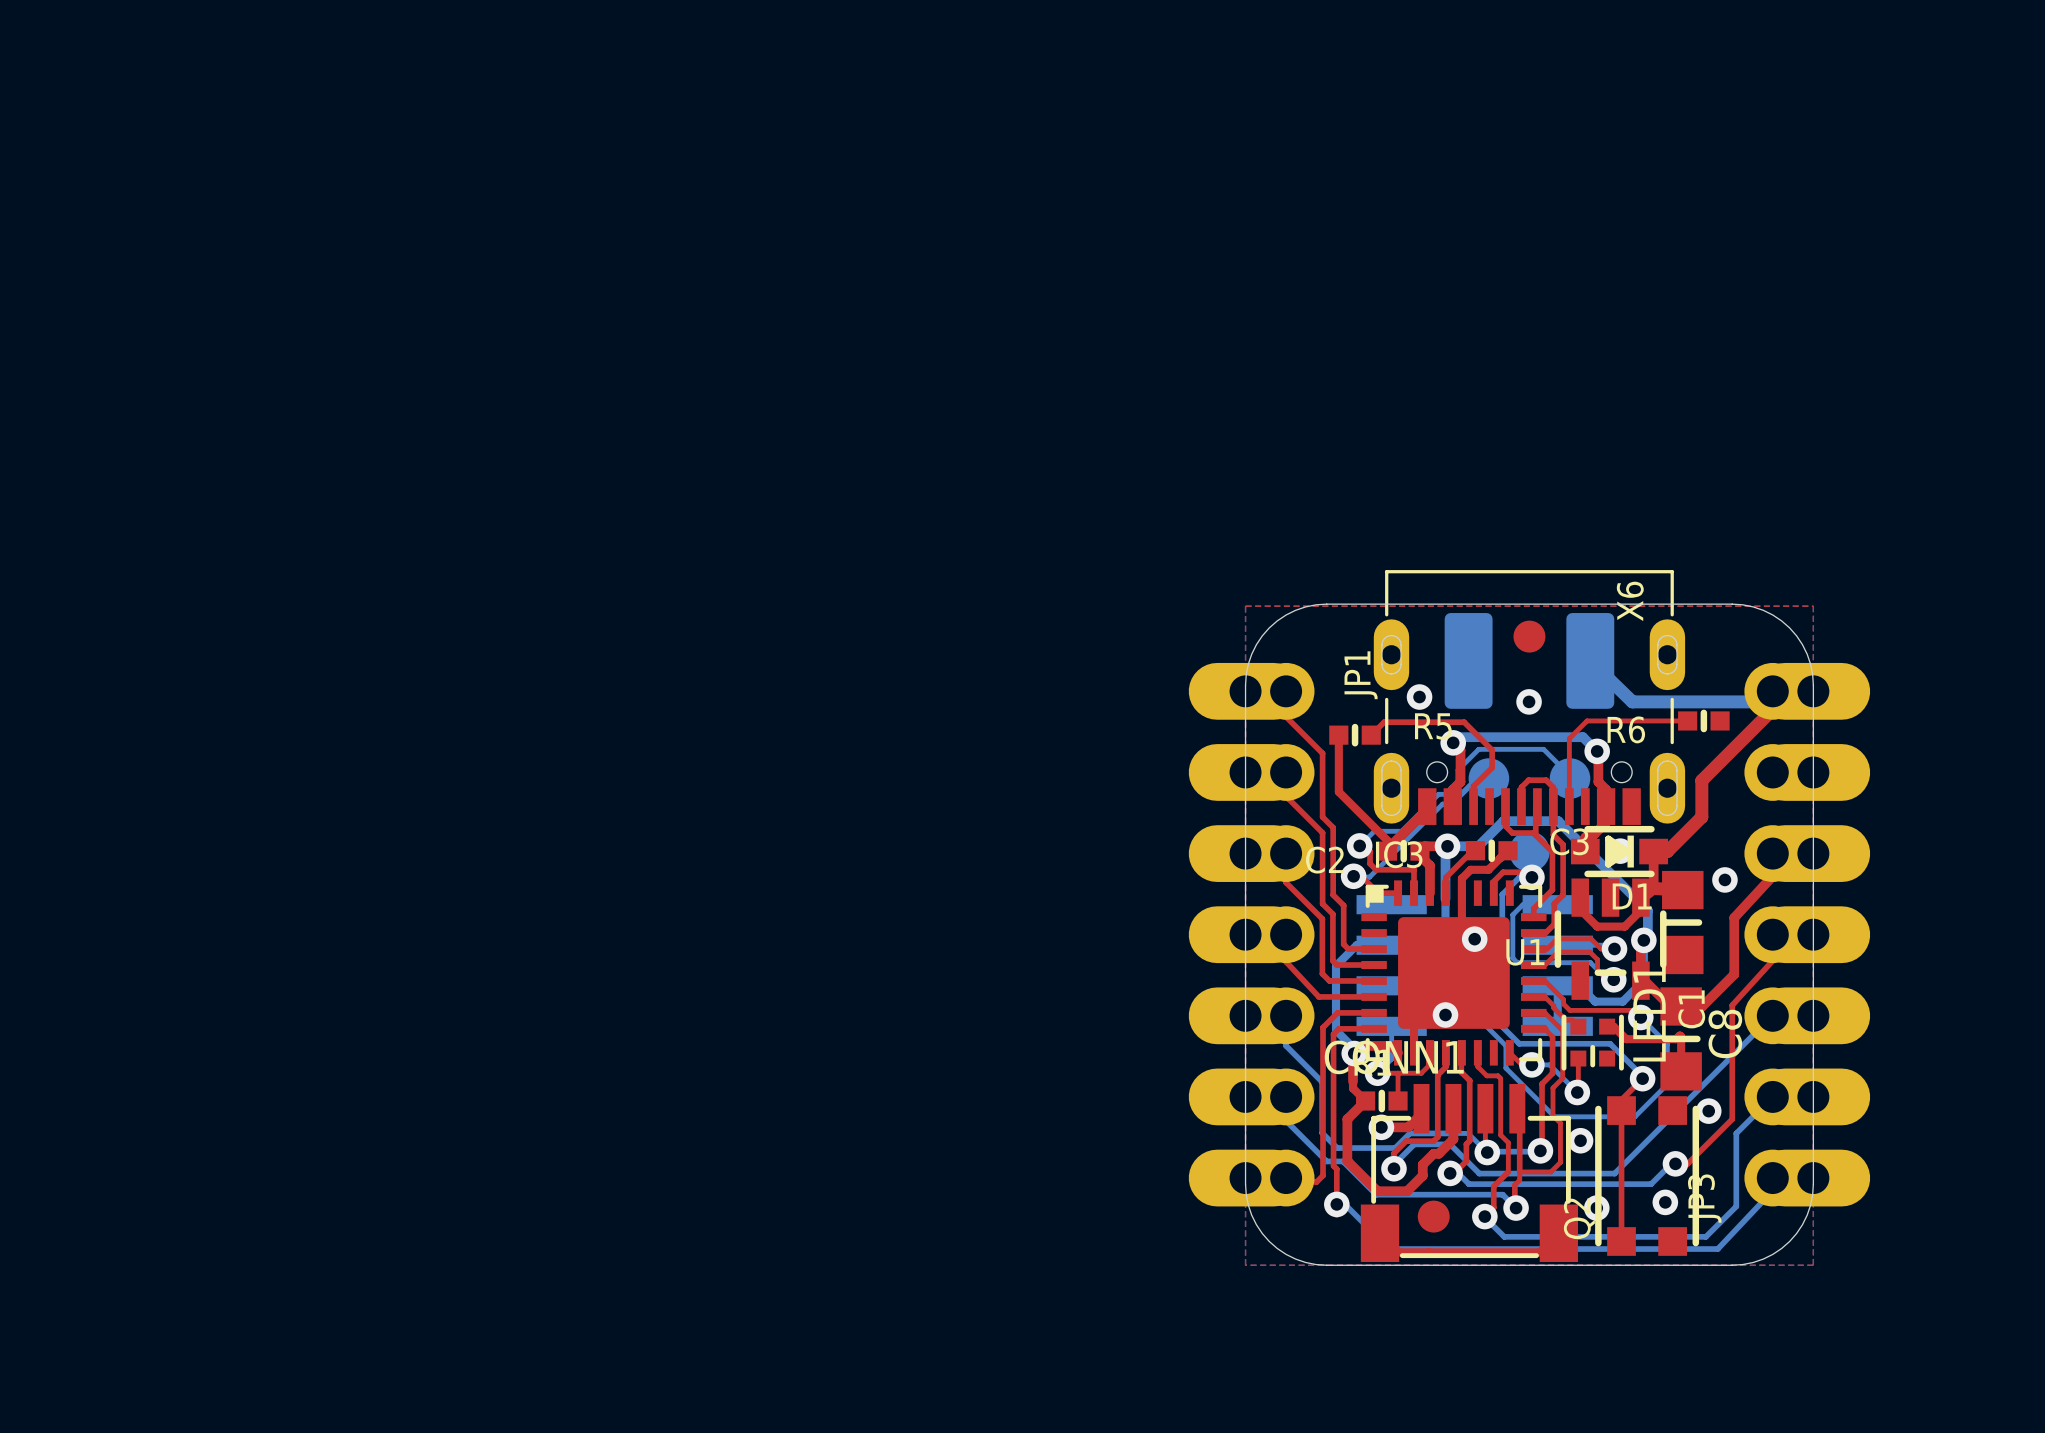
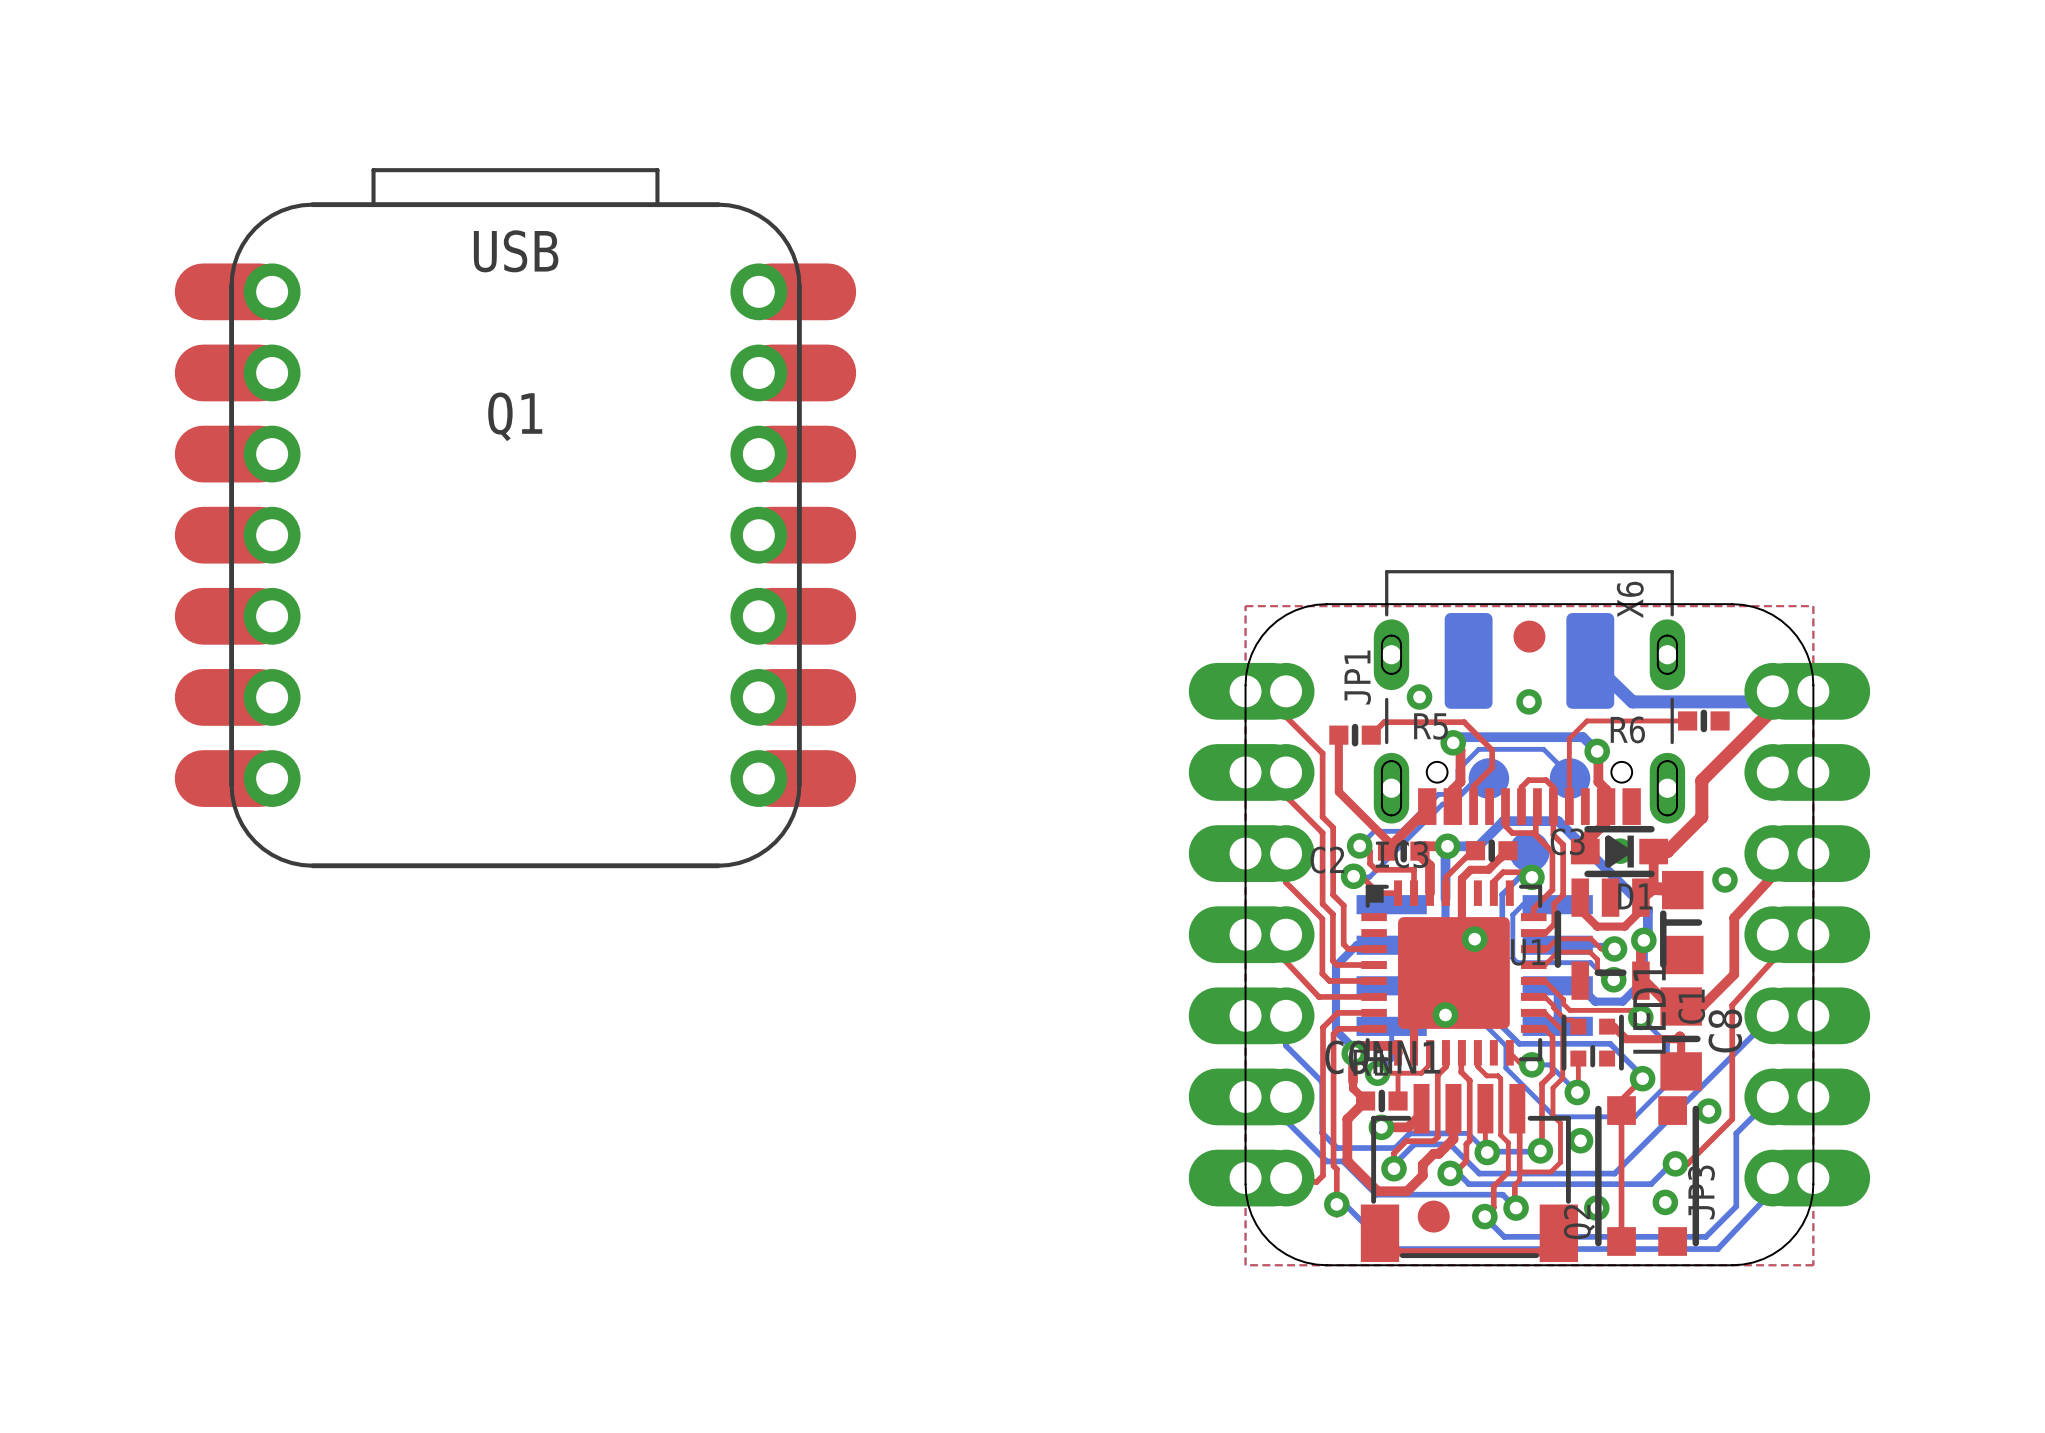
Q1: none -> (515, 518)

